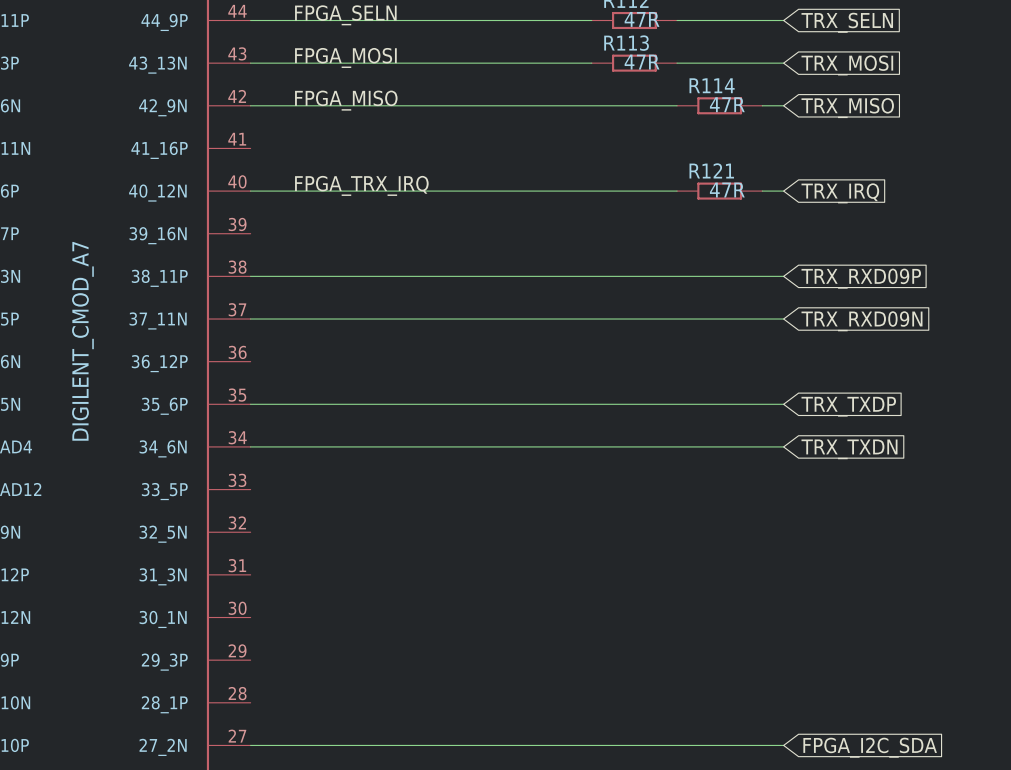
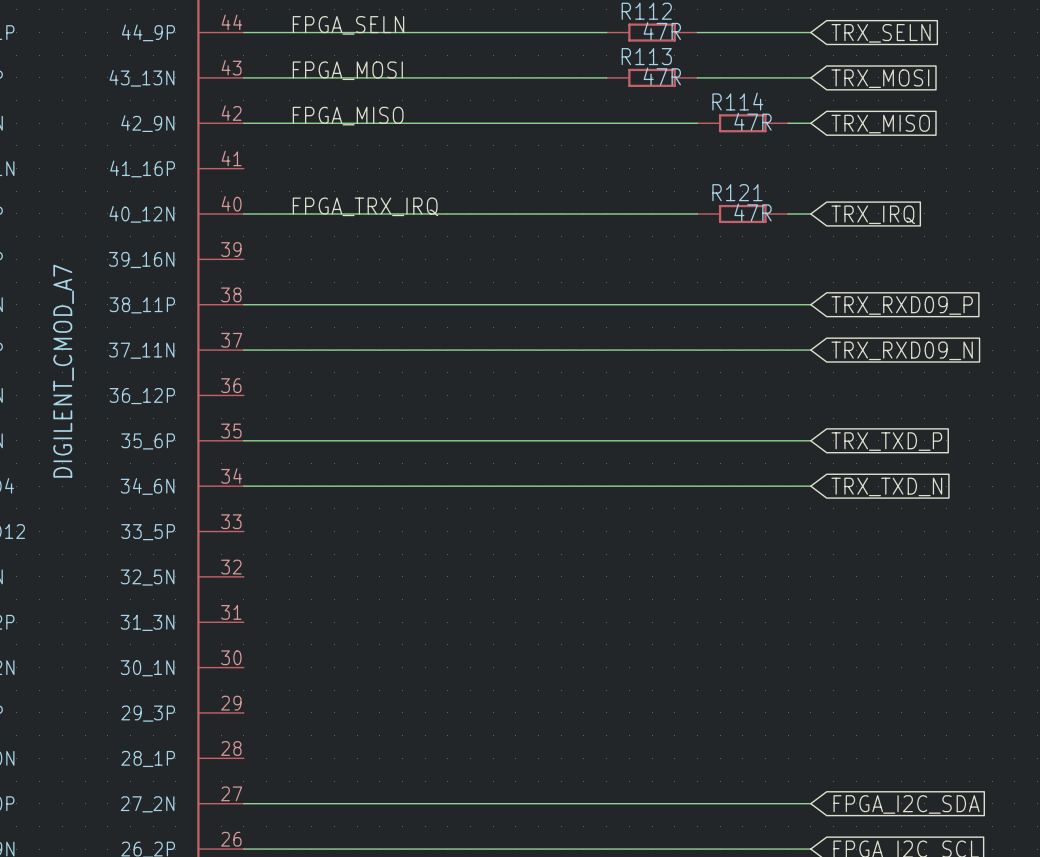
global label: TRX_RXD09P (861, 278) -> TRX_RXD09_P (902, 305)
global label: TRX_RXD09N (861, 321) -> TRX_RXD09_N (902, 350)
global label: TRX_TXDP (848, 406) -> TRX_TXD_P (886, 441)
global label: TRX_TXDN (849, 449) -> TRX_TXD_N (886, 486)

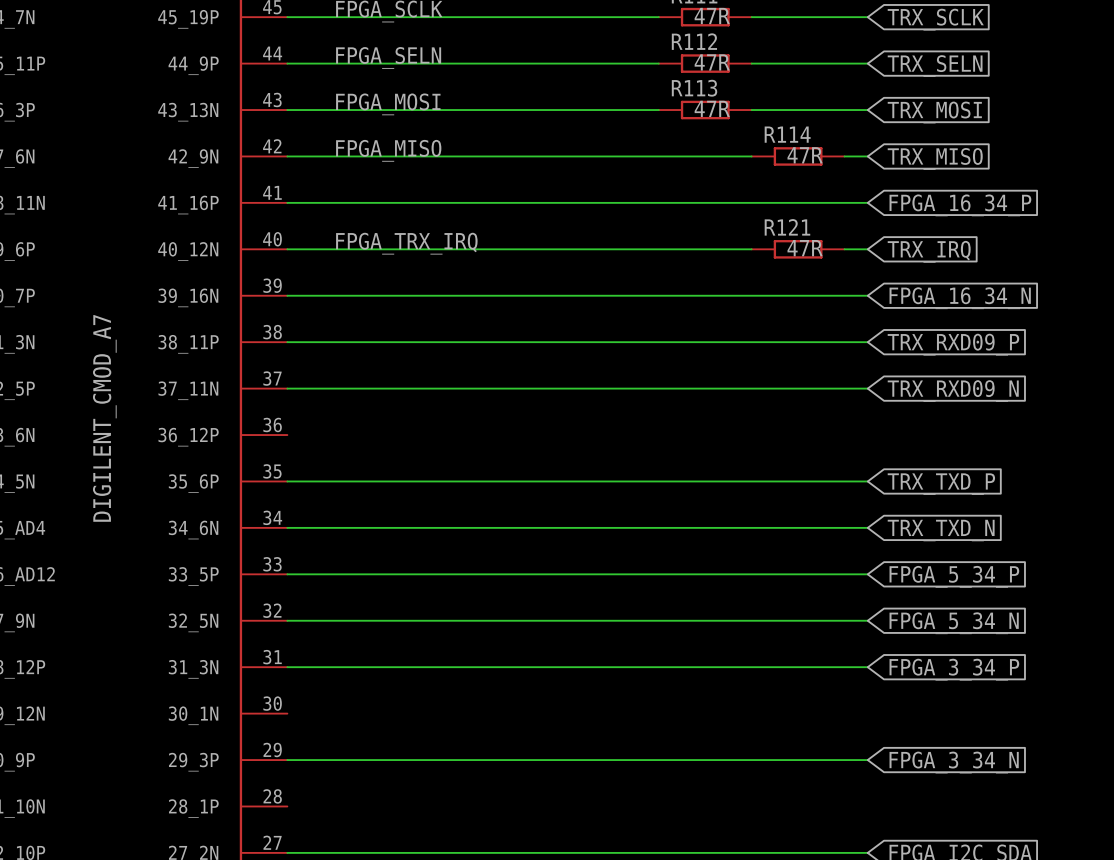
wire: none -> (287, 202) (867, 202)
global label: none -> FPGA_16_34_P (960, 205)
wire: none -> (287, 295) (867, 295)
global label: none -> FPGA_16_34_N (960, 298)
wire: none -> (287, 574) (867, 574)
global label: none -> FPGA_5_34_P (954, 576)
wire: none -> (287, 620) (867, 620)
global label: none -> FPGA_5_34_N (954, 623)
wire: none -> (287, 667) (867, 667)
global label: none -> FPGA_3_34_P (954, 669)
wire: none -> (287, 760) (867, 760)
global label: none -> FPGA_3_34_N (954, 762)

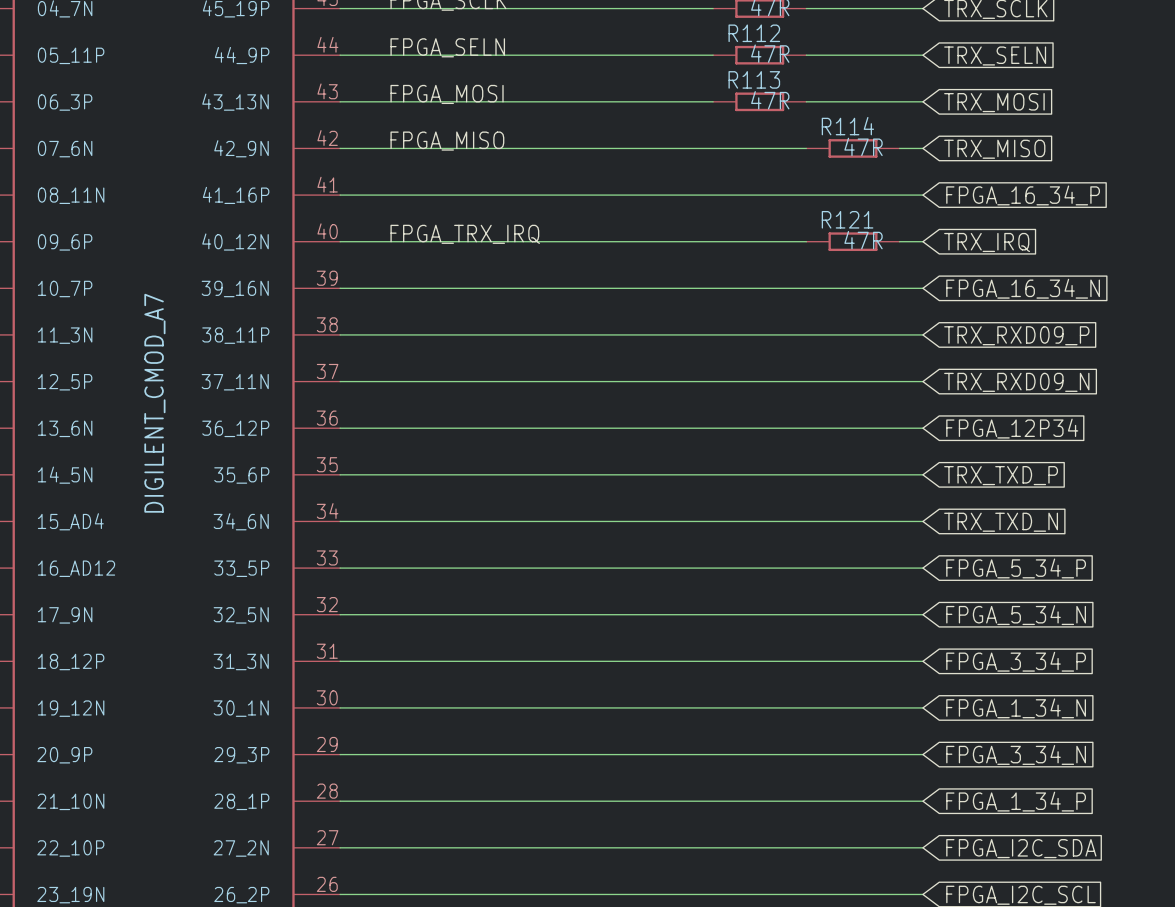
wire: none -> (340, 428) (922, 428)
global label: none -> FPGA_12P34 (1012, 428)
wire: none -> (340, 707) (922, 707)
global label: none -> FPGA_1_34_N (1016, 708)
wire: none -> (340, 801) (922, 801)
global label: none -> FPGA_1_34_P (1016, 801)

